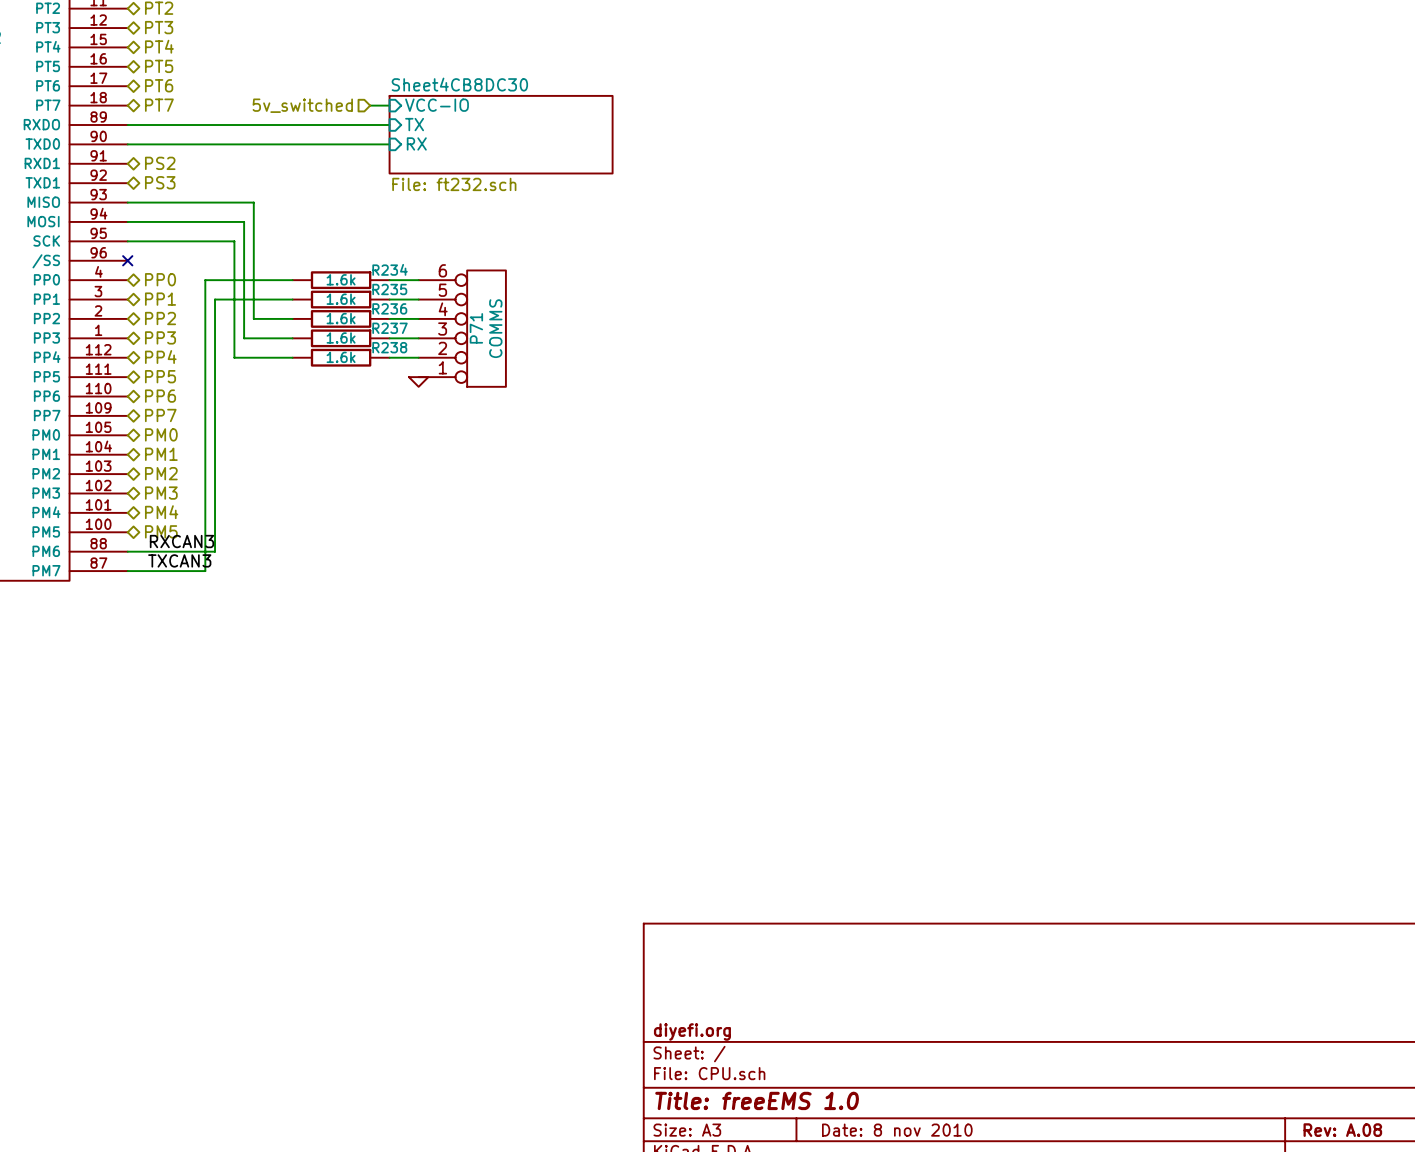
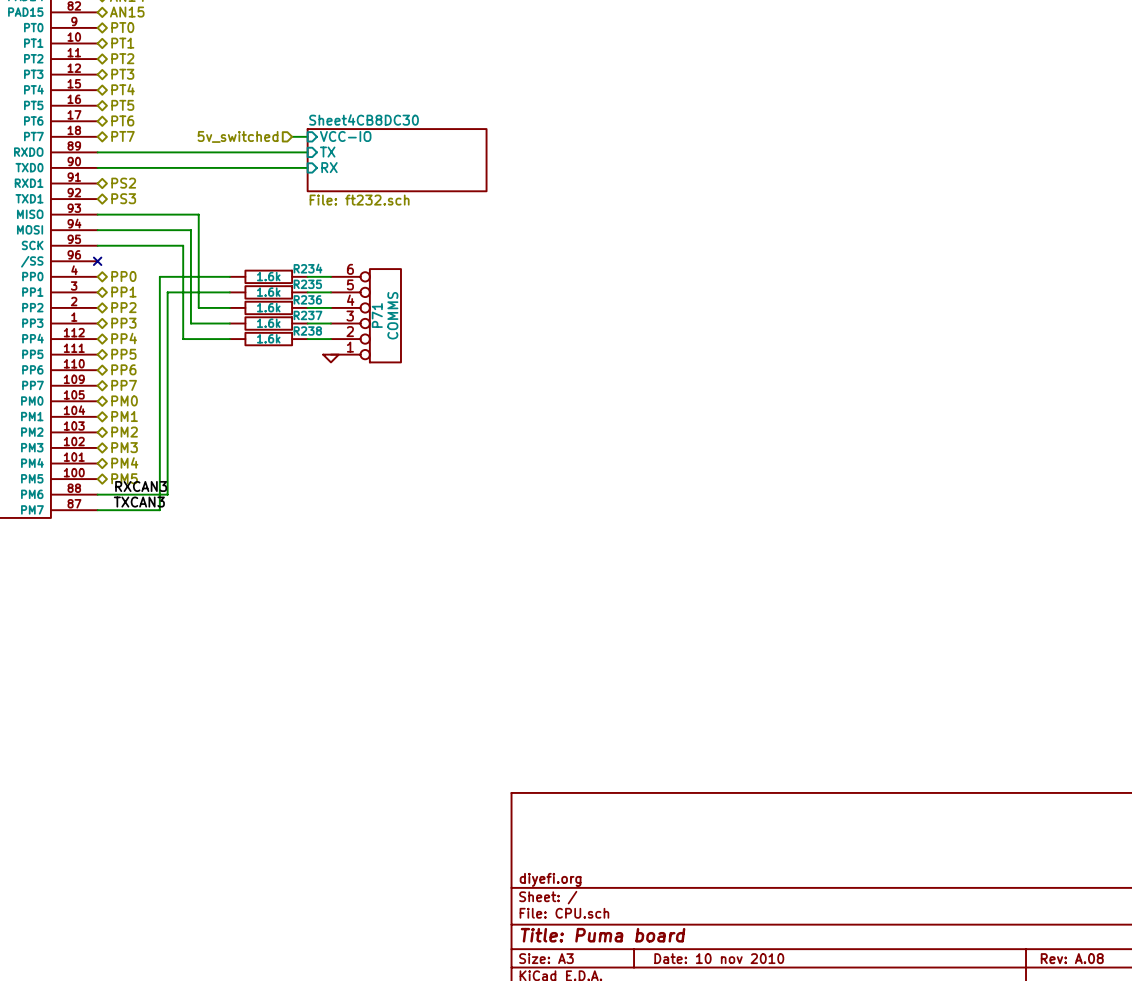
title block: Title: freeEMS 1.0 (757, 1100) -> Title: Puma board (603, 935)
title block: Date: 8 nov 2010 (897, 1130) -> Date: 10 nov 2010 (719, 958)

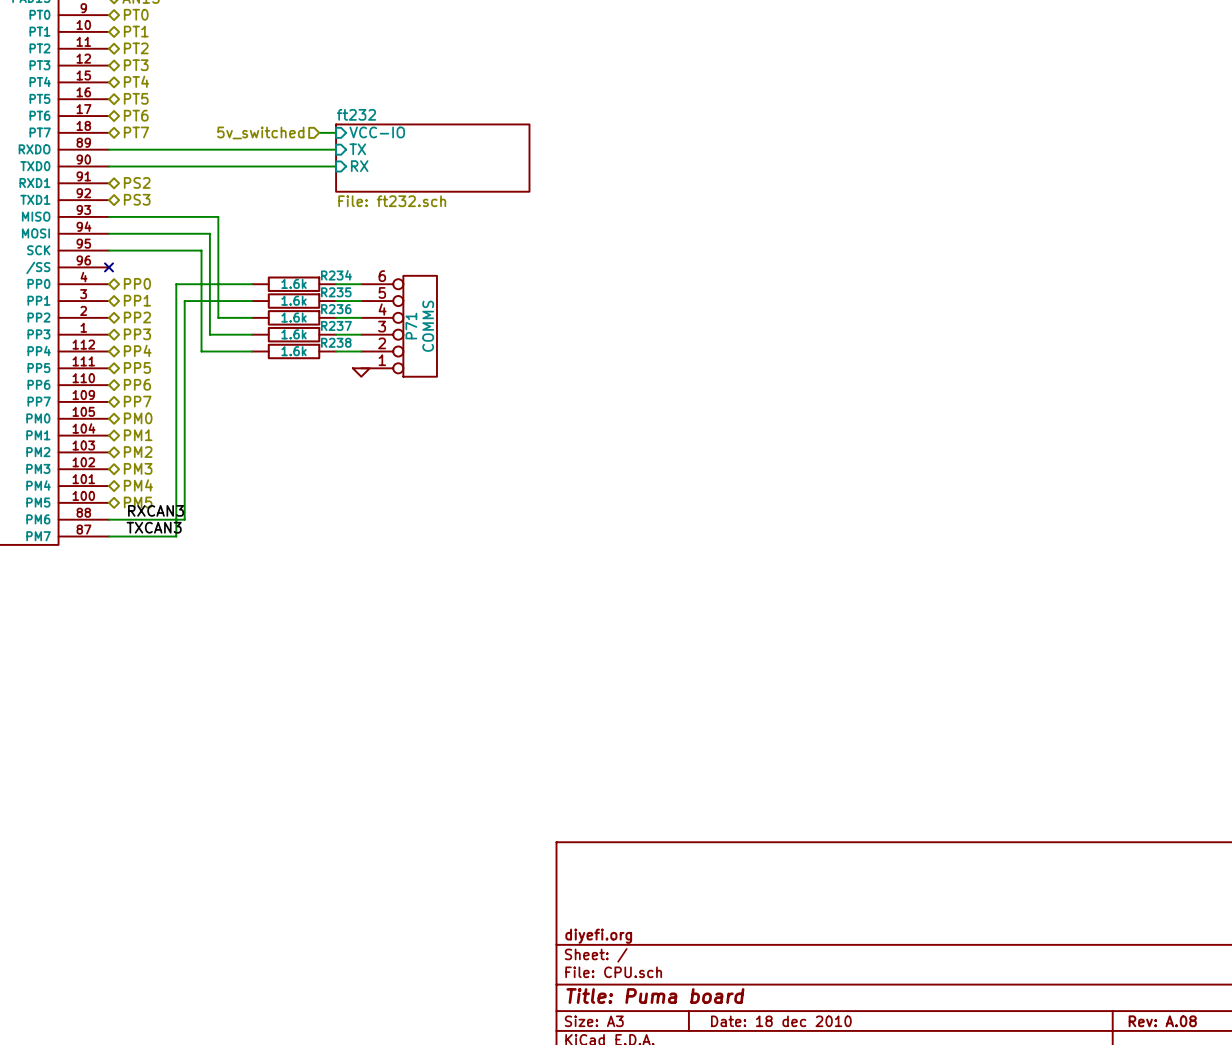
sheet Sheet4CB8DC30 name: Sheet4CB8DC30 (364, 119) -> ft232 (356, 114)
title block: Date: 10 nov 2010 (719, 958) -> Date: 18 dec 2010 (781, 1021)

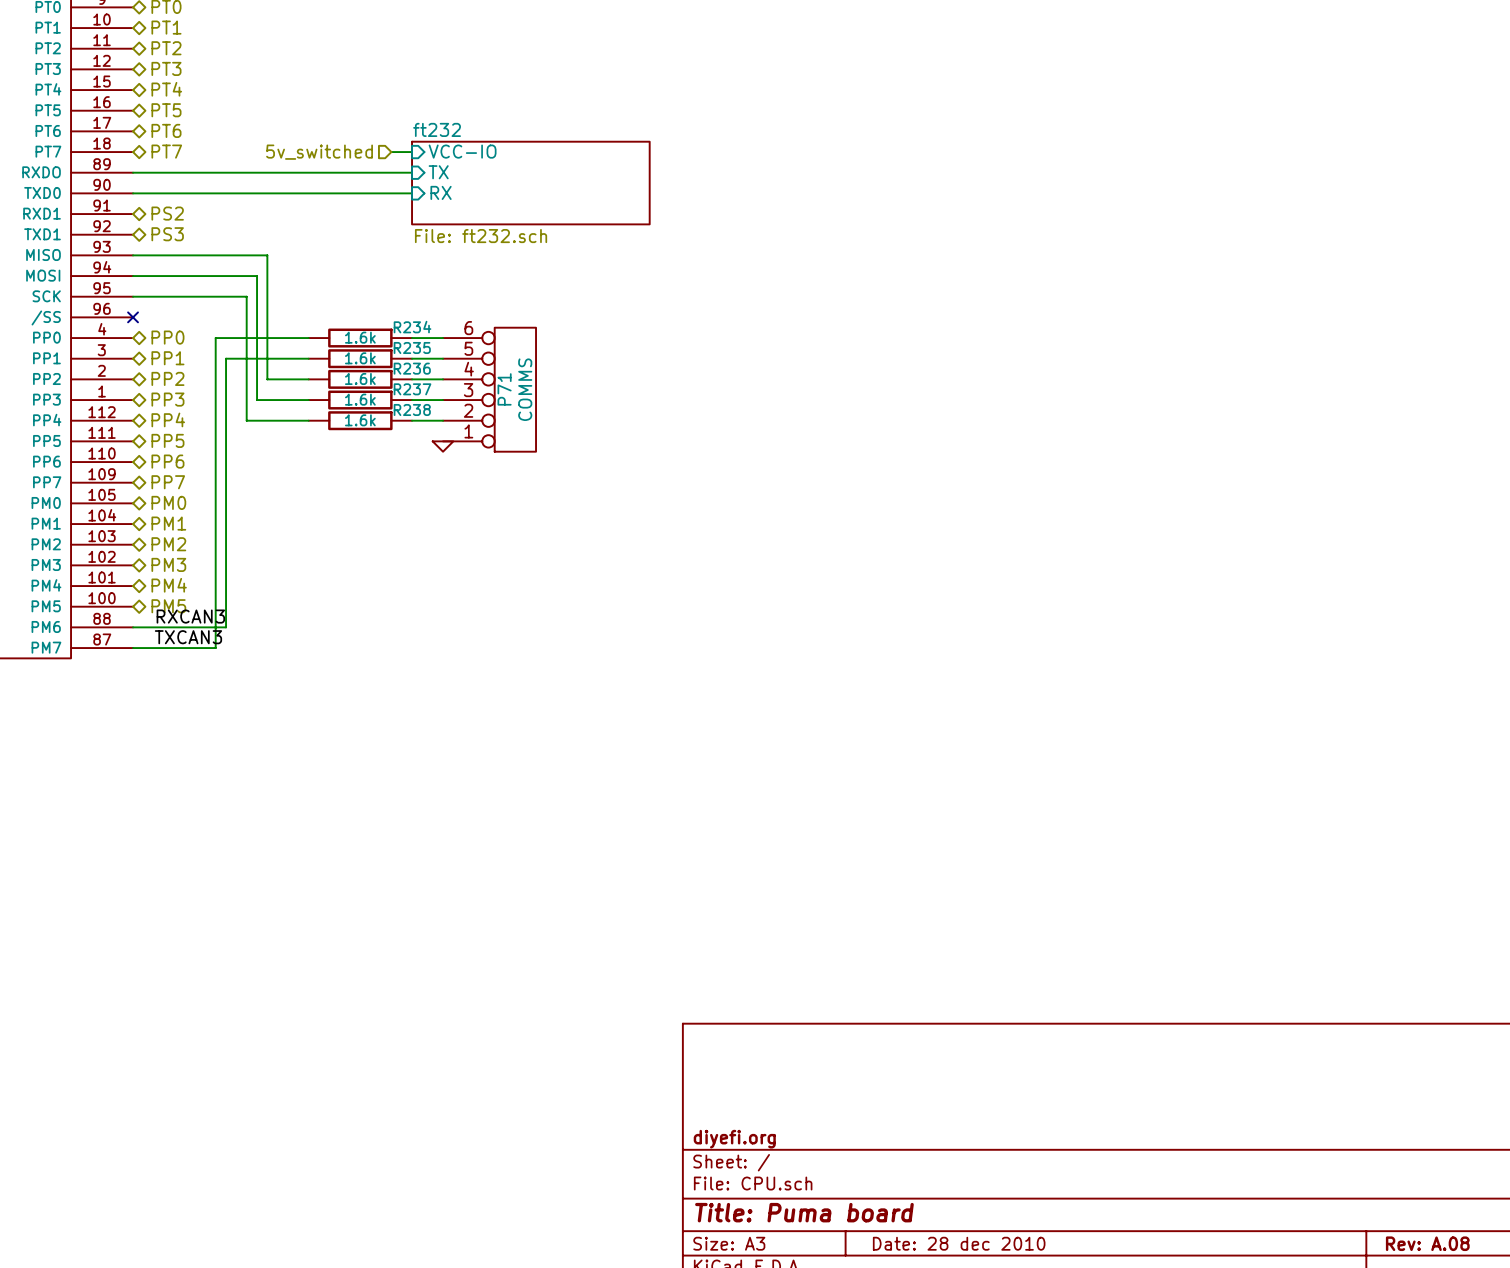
title block: Date: 18 dec 2010 (781, 1021) -> Date: 28 dec 2010 (959, 1243)

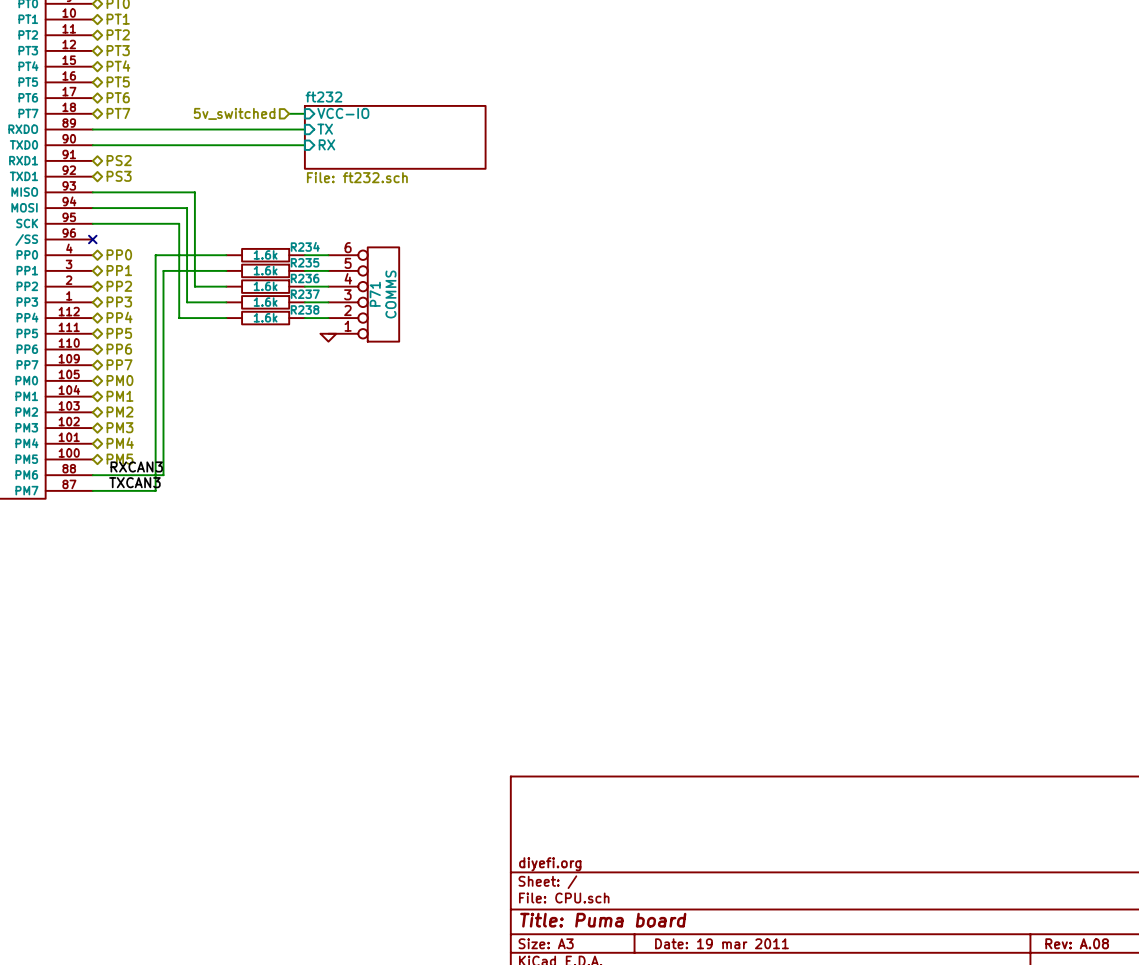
title block: Date: 28 dec 2010 (959, 1243) -> Date: 19 mar 2011 (721, 943)

